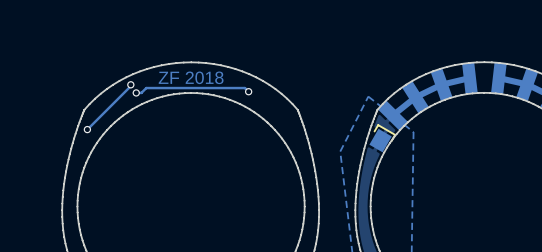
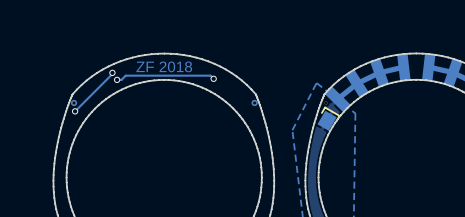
part: none -> (74, 102)
part: none -> (254, 102)
part: none -> (326, 102)

